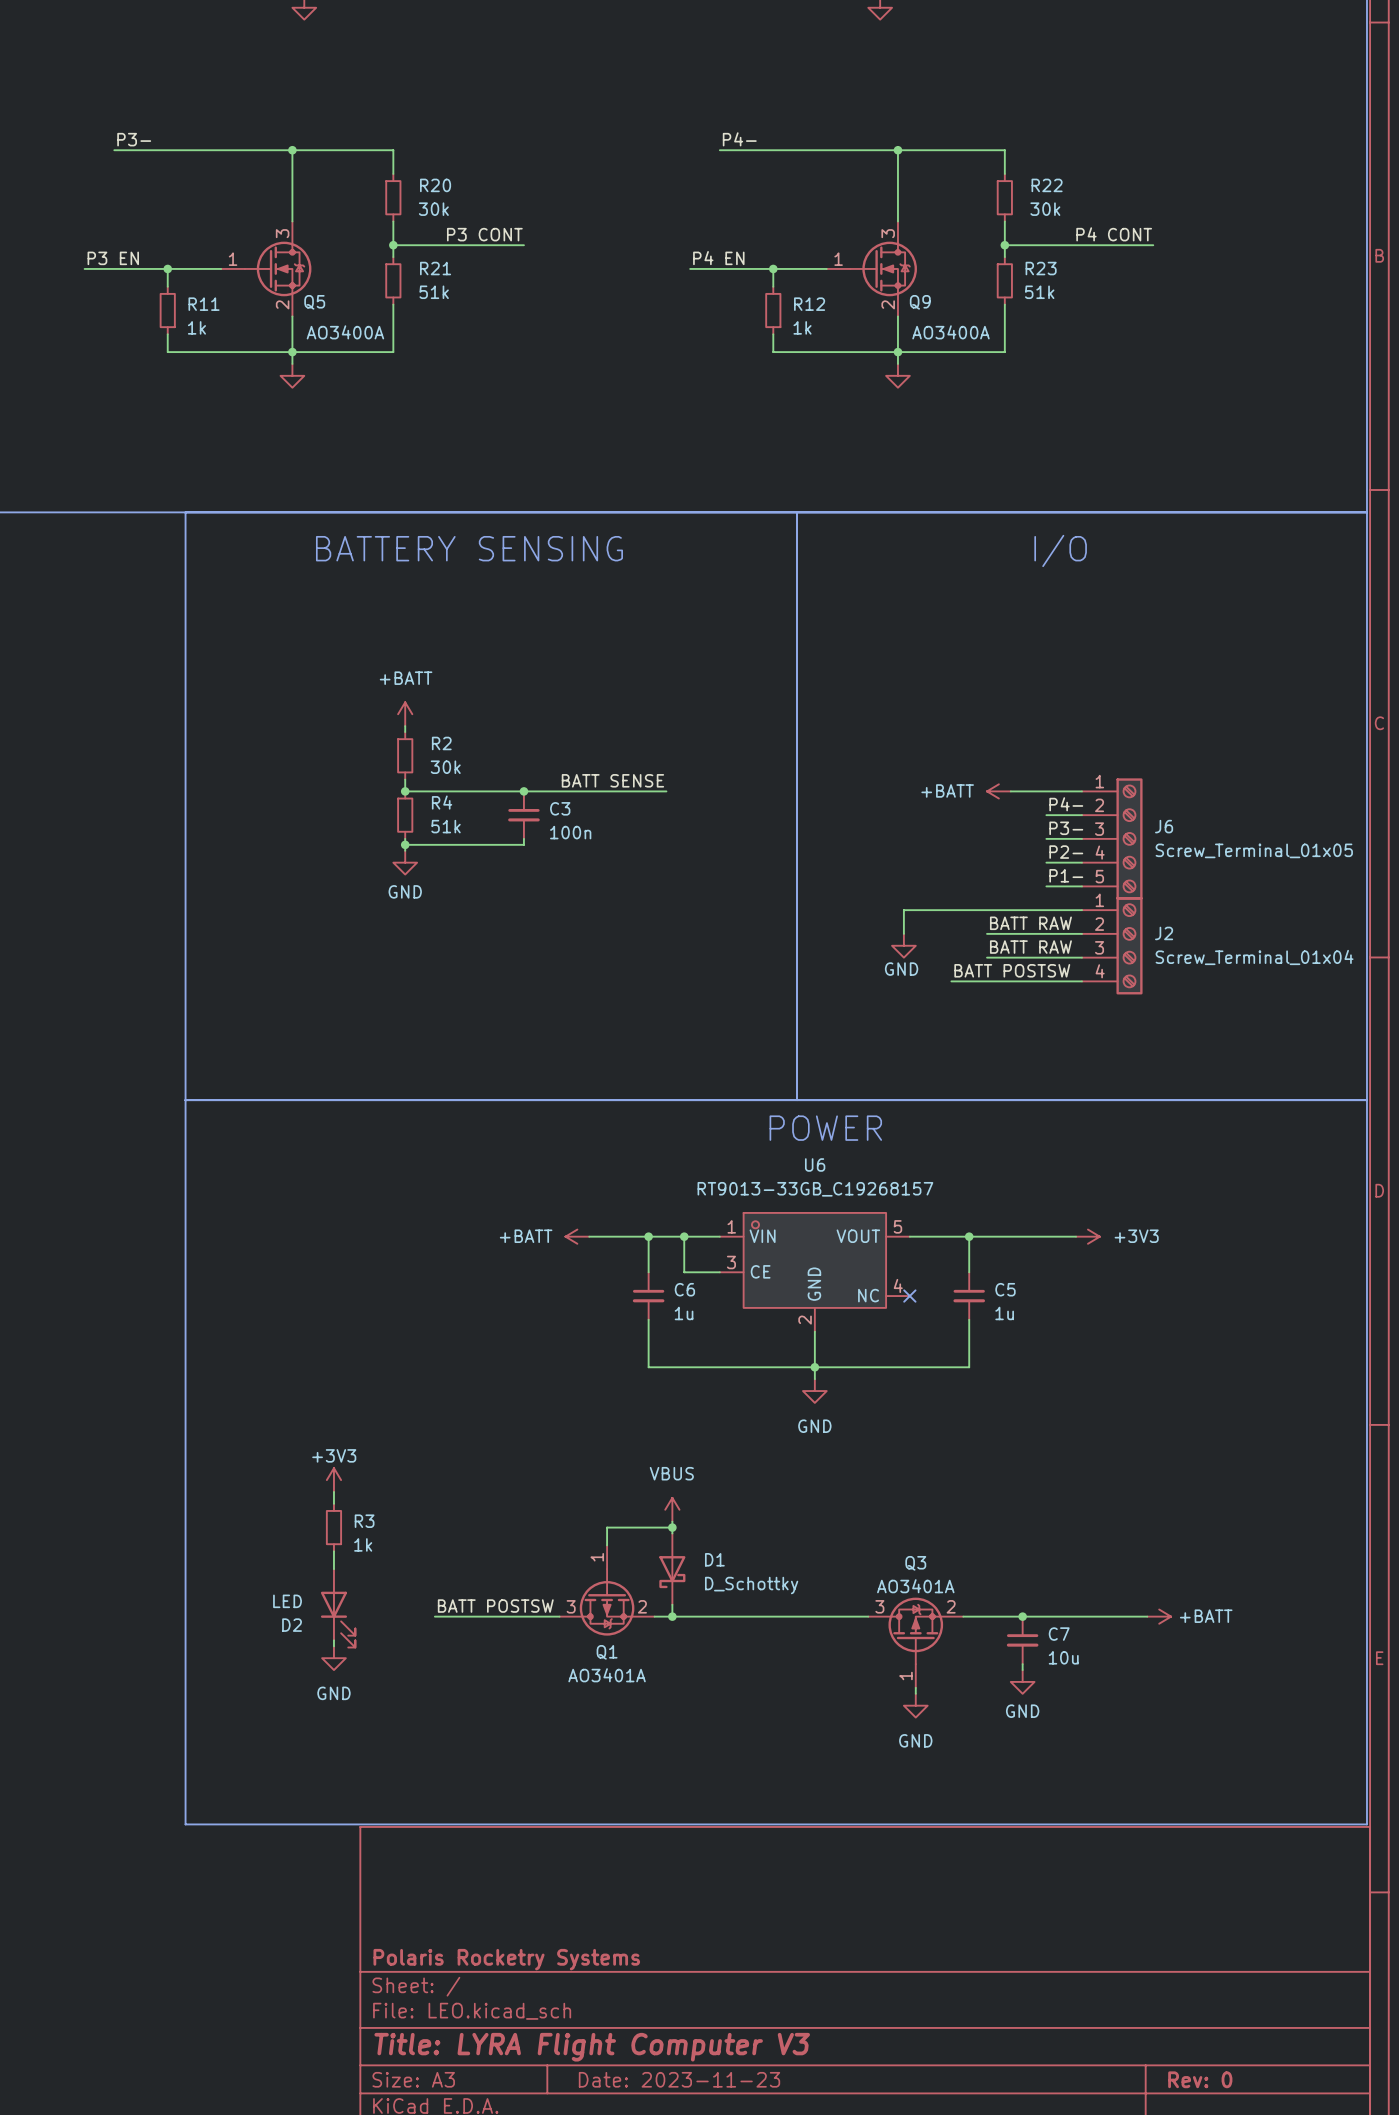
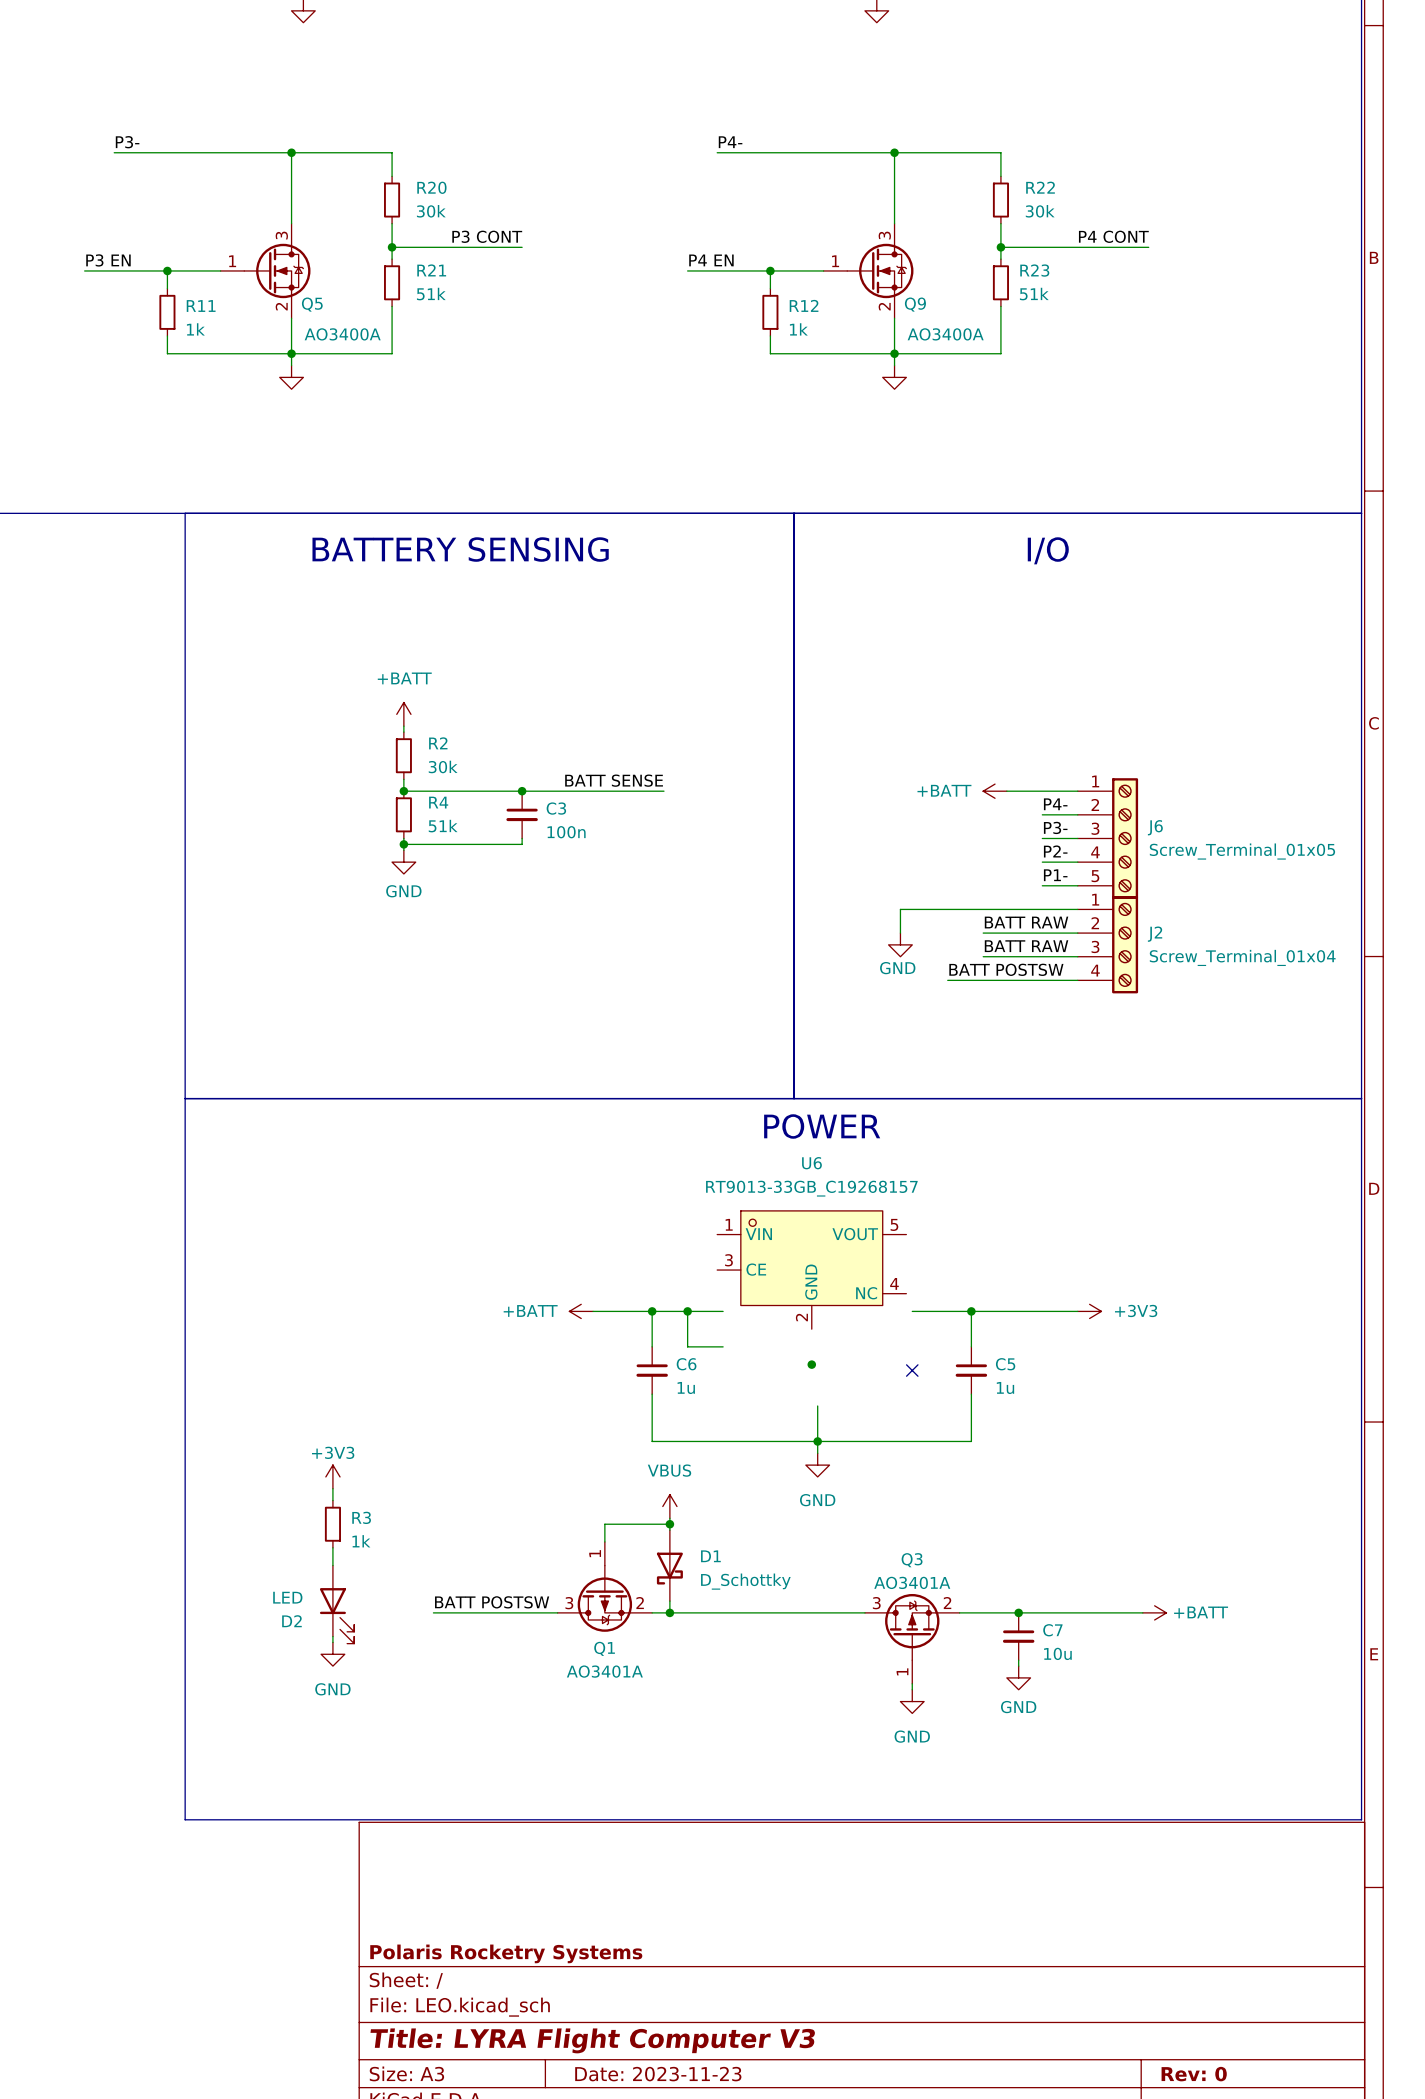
power symbol position: +BATT (577, 1236) -> +BATT (581, 1311)
wire: (589, 1236) (719, 1236) -> (593, 1311) (723, 1311)
wire: (648, 1236) (648, 1272) -> (652, 1311) (652, 1346)
junction: (648, 1236) -> none
wire: (684, 1236) (684, 1272) (719, 1272) -> (687, 1311) (687, 1346) (723, 1346)
junction: (684, 1236) -> none
wire: (909, 1236) (1076, 1236) -> (912, 1311) (1077, 1311)
wire: (969, 1236) (969, 1272) -> (971, 1311) (971, 1346)
junction: (969, 1236) -> none
power symbol position: +3V3 (1087, 1236) -> +3V3 (1089, 1311)
C6 position: (648, 1296) -> (652, 1370)
no-connect mark: (909, 1296) -> none
C5 position: (969, 1296) -> (971, 1370)
junction: none -> (652, 1311)
junction: none -> (687, 1311)
junction: none -> (971, 1311)
wire: (648, 1319) (648, 1367) (969, 1367) (969, 1319) -> (652, 1394) (652, 1441) (971, 1441) (971, 1394)
wire: (814, 1331) (814, 1379) -> (817, 1405) (817, 1453)
no-connect mark: none -> (912, 1370)
power symbol position: GND (814, 1391) -> GND (817, 1465)
junction: none -> (817, 1441)

